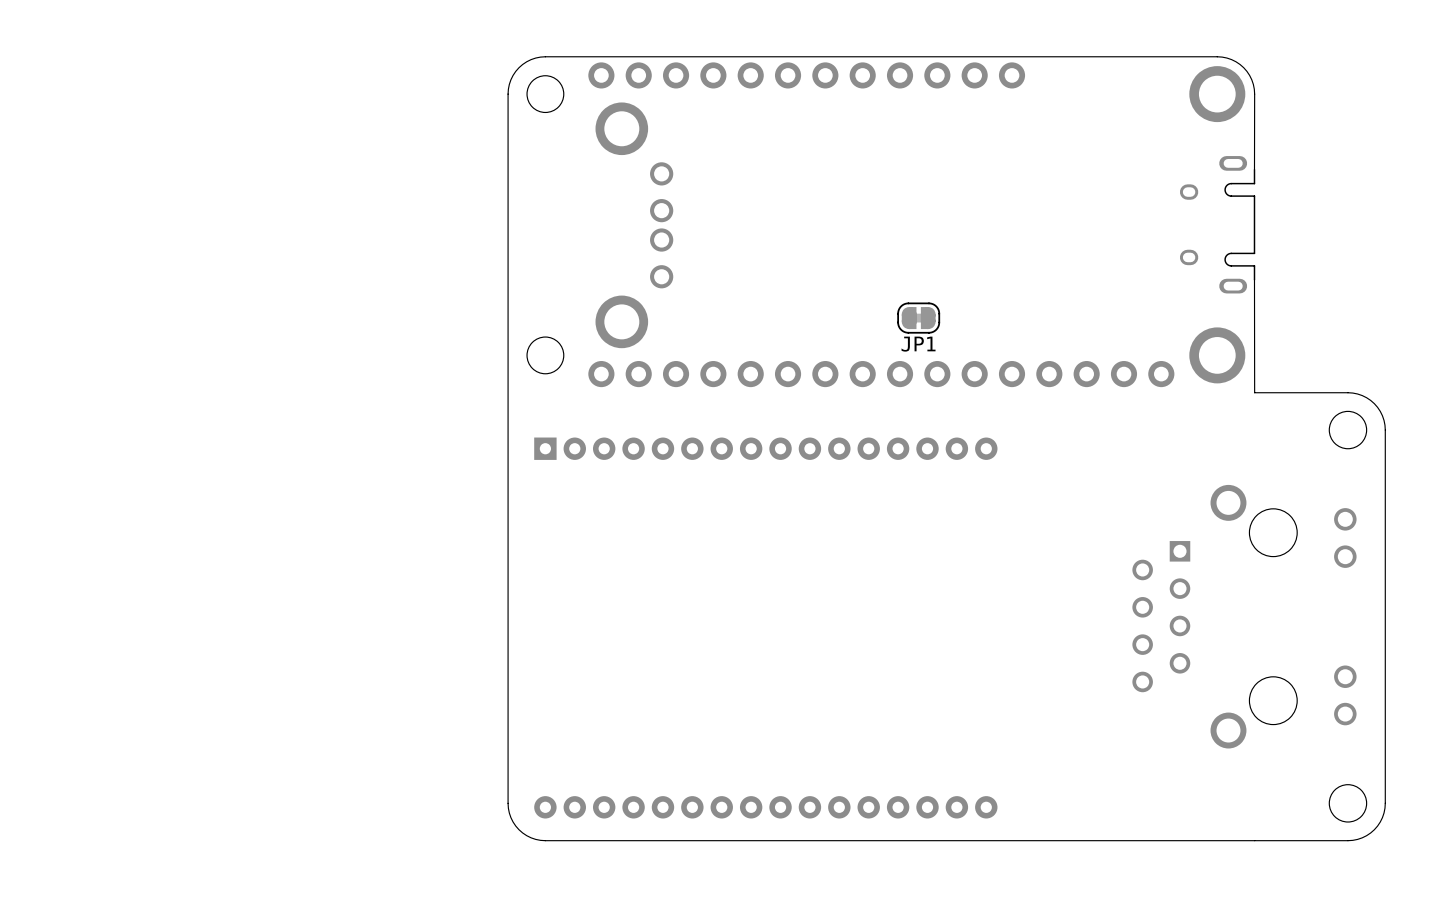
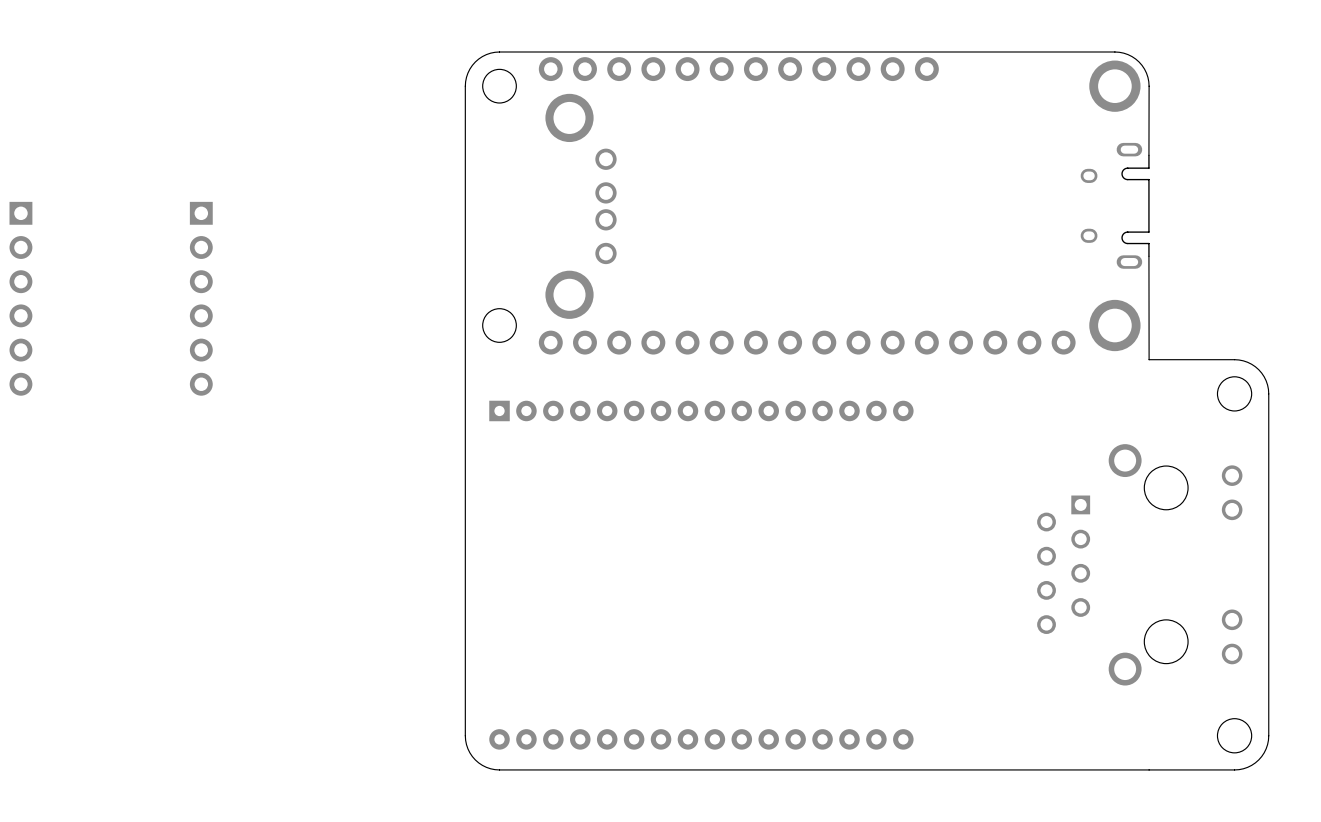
JP1: (918, 318) -> none
part: none -> (20, 298)
part: none -> (201, 298)

